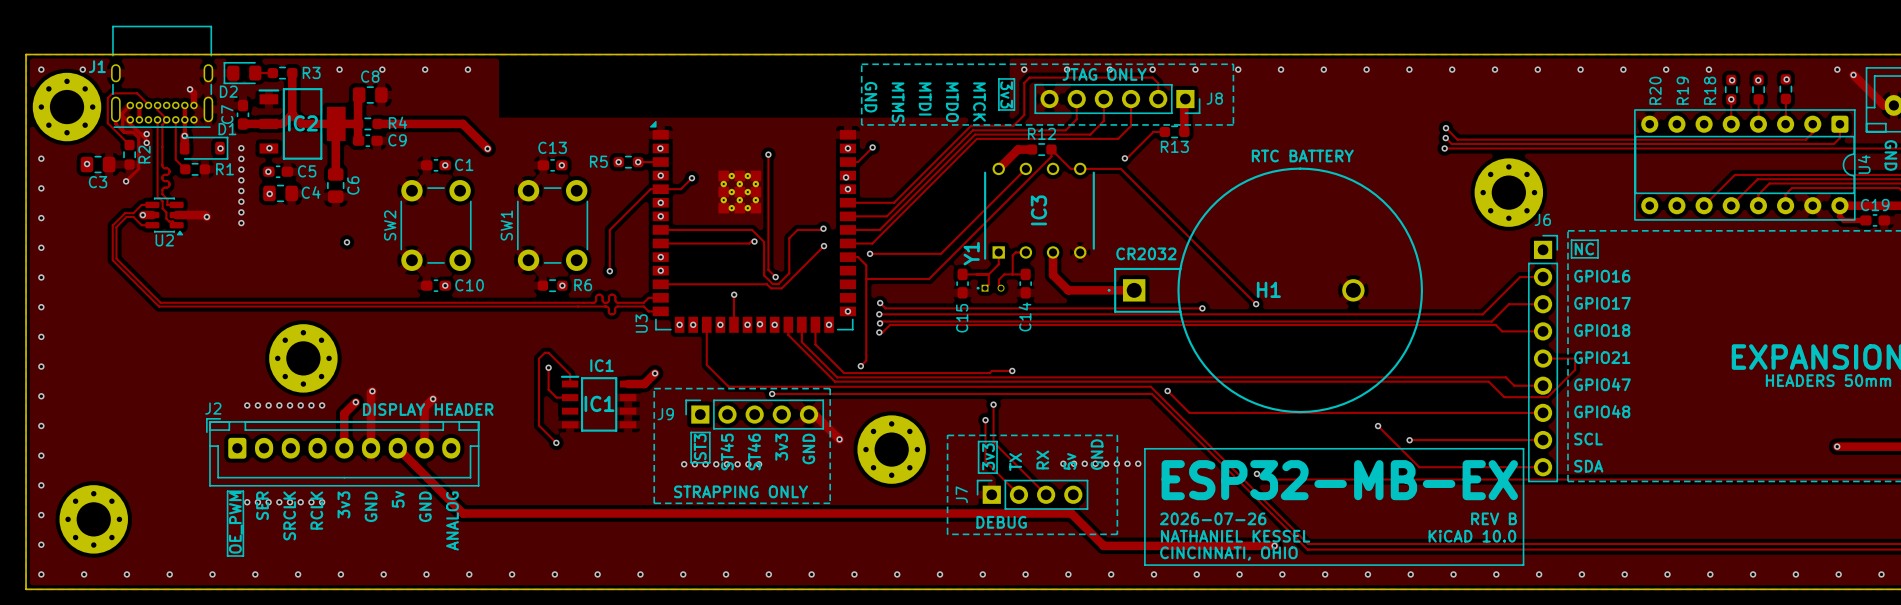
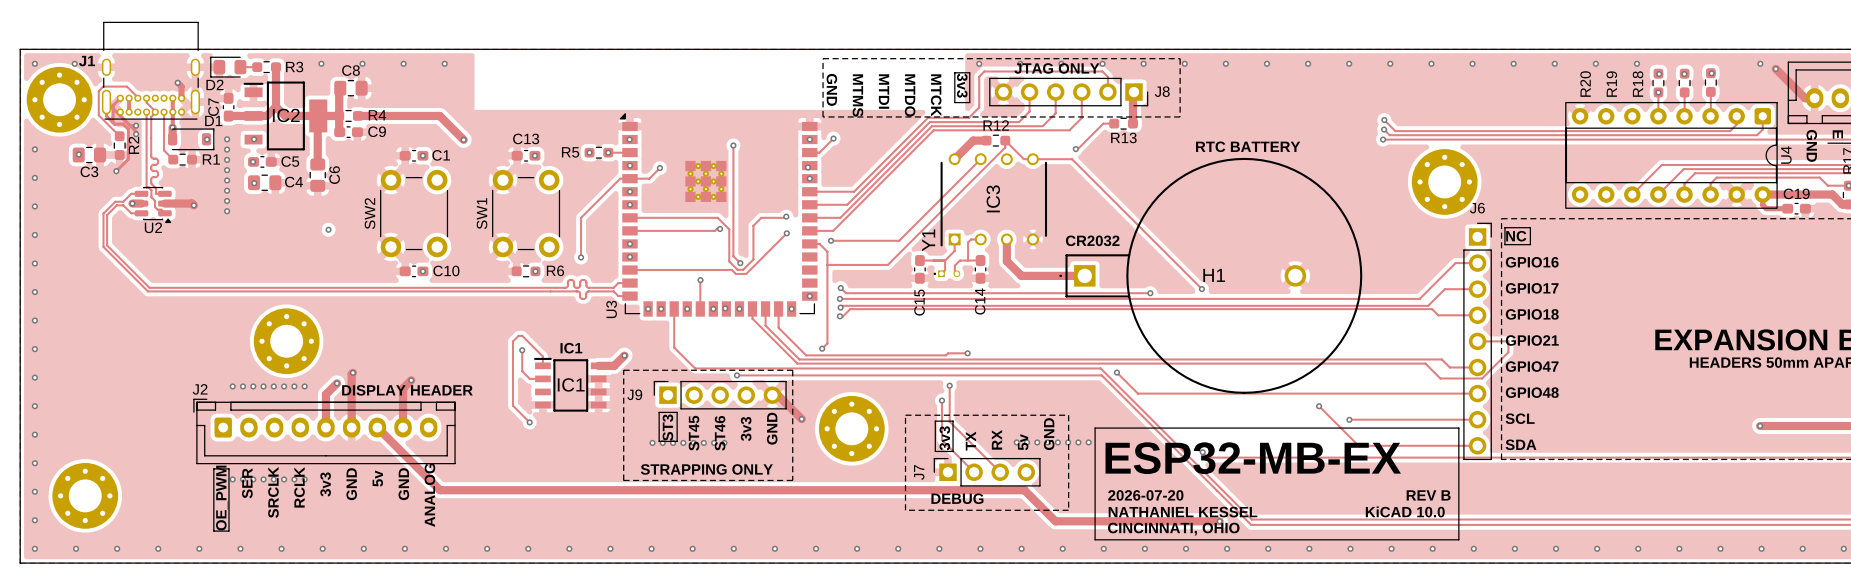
text: 2026-07-26 (1213, 518) -> 2026-07-20 (1145, 495)

